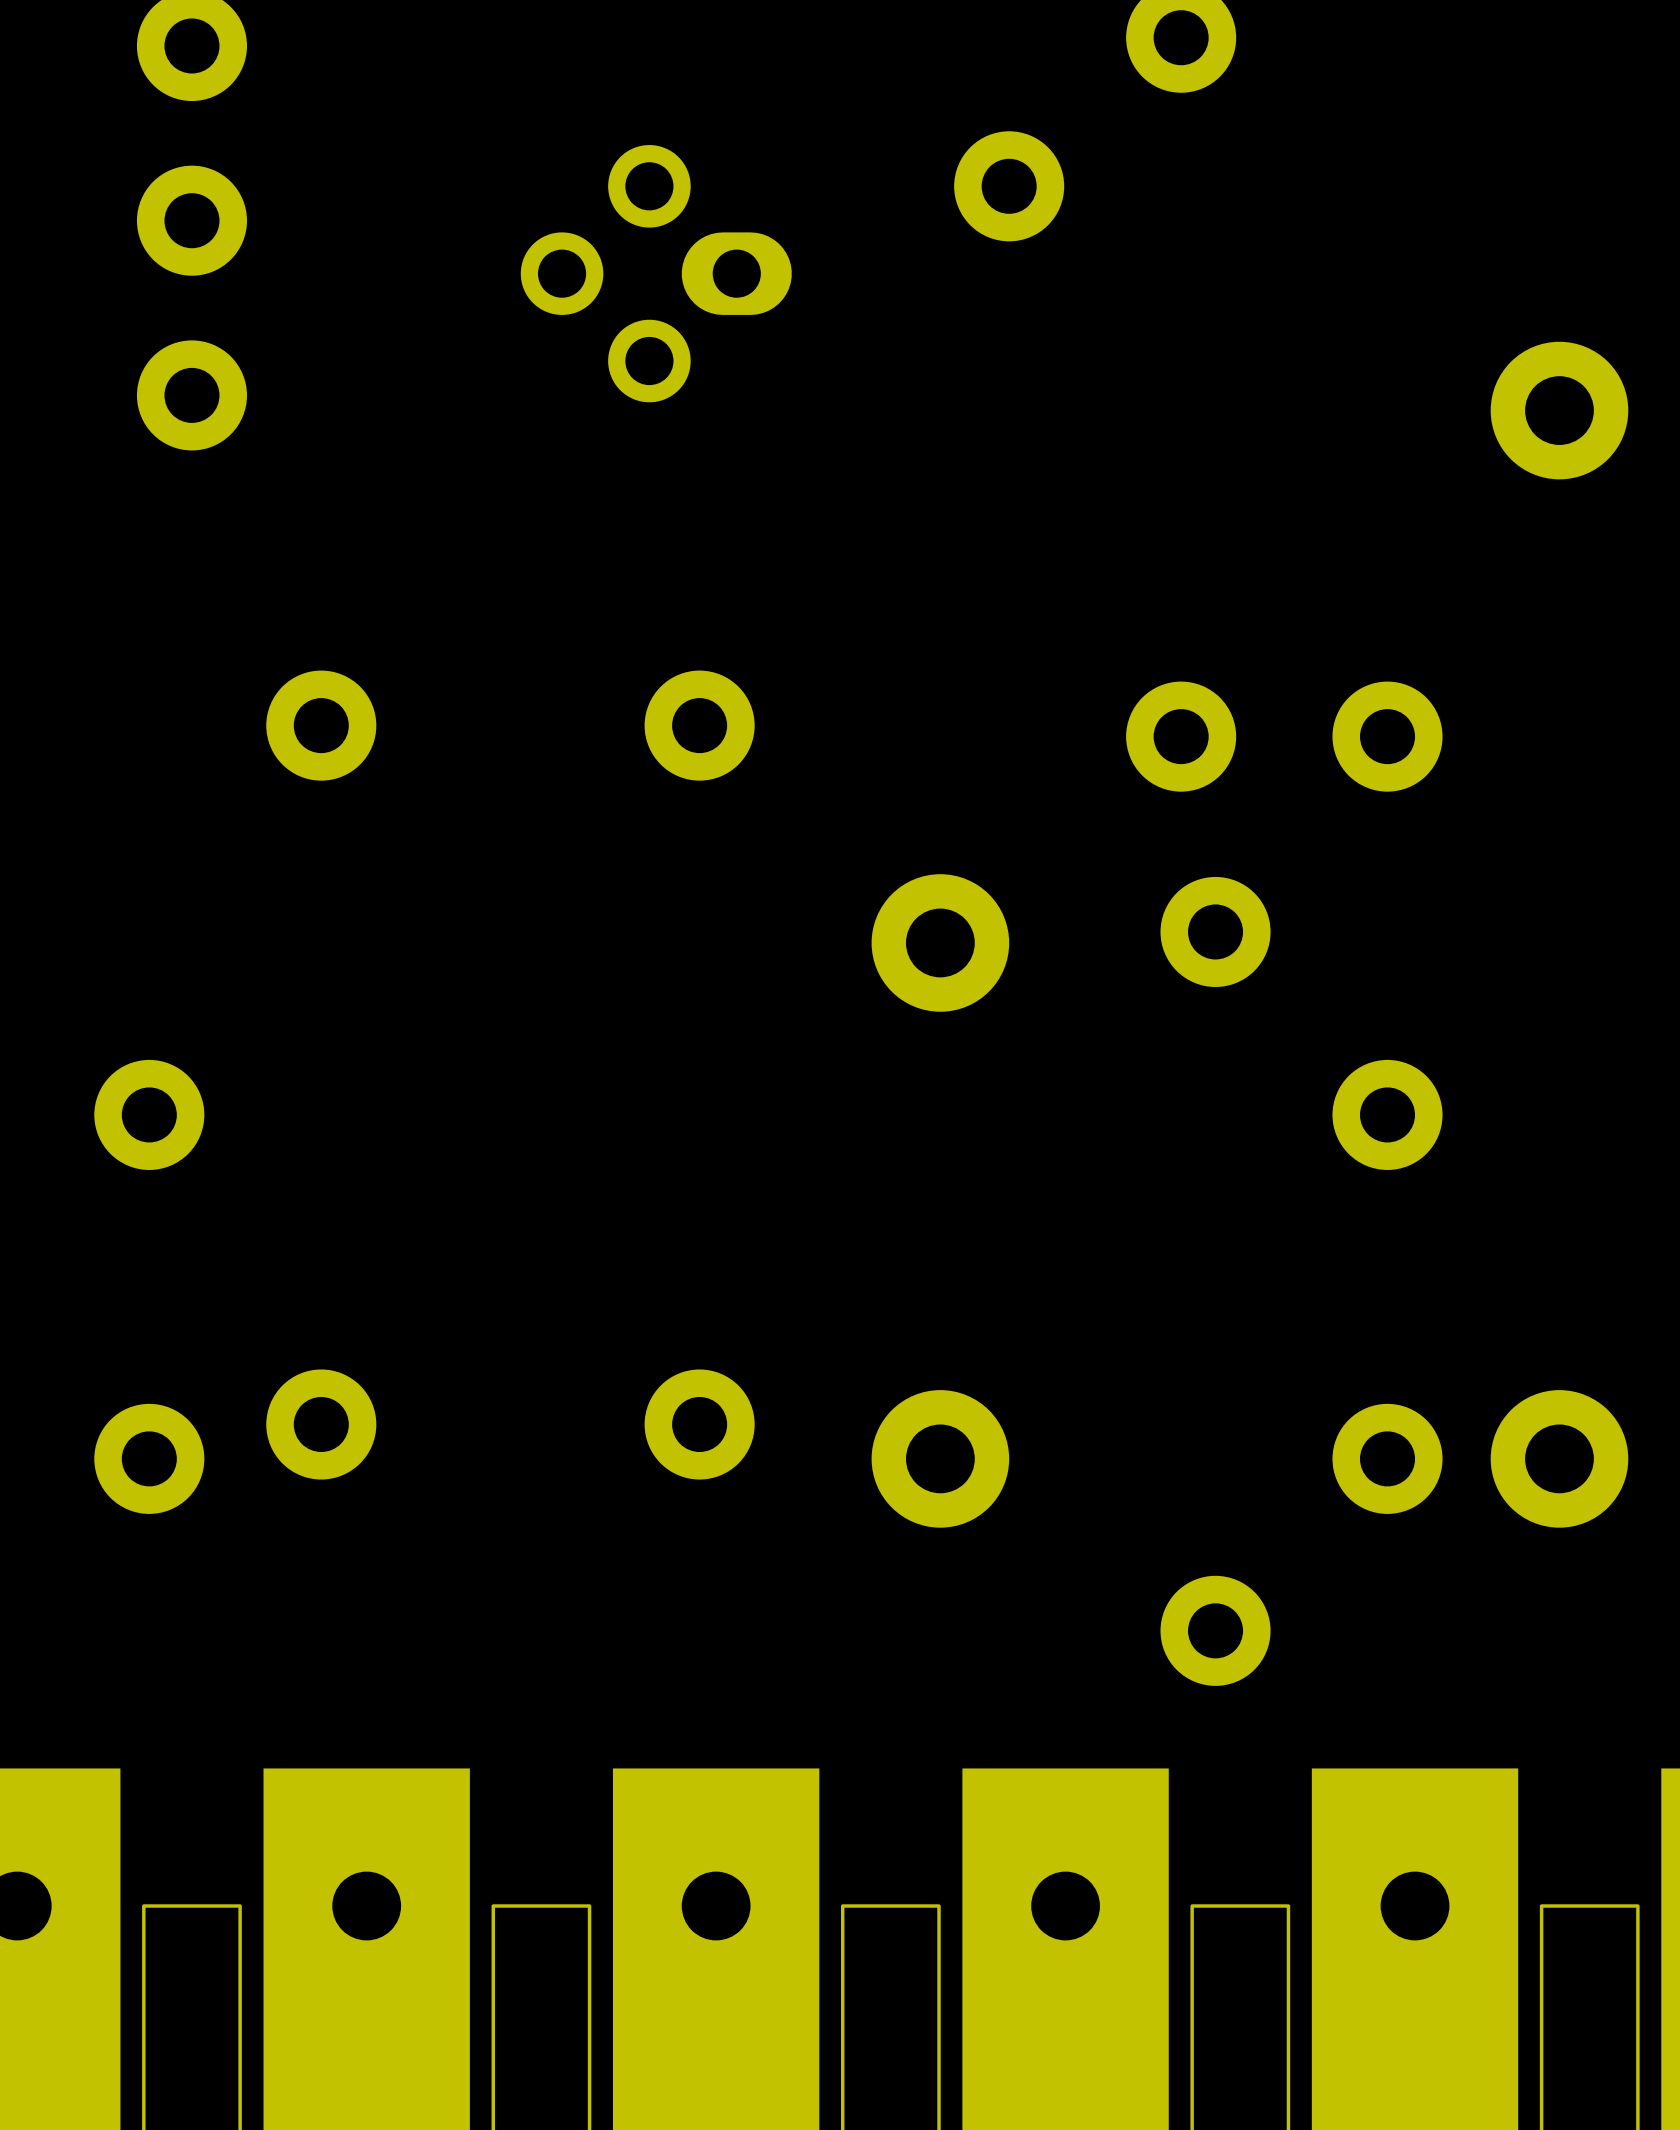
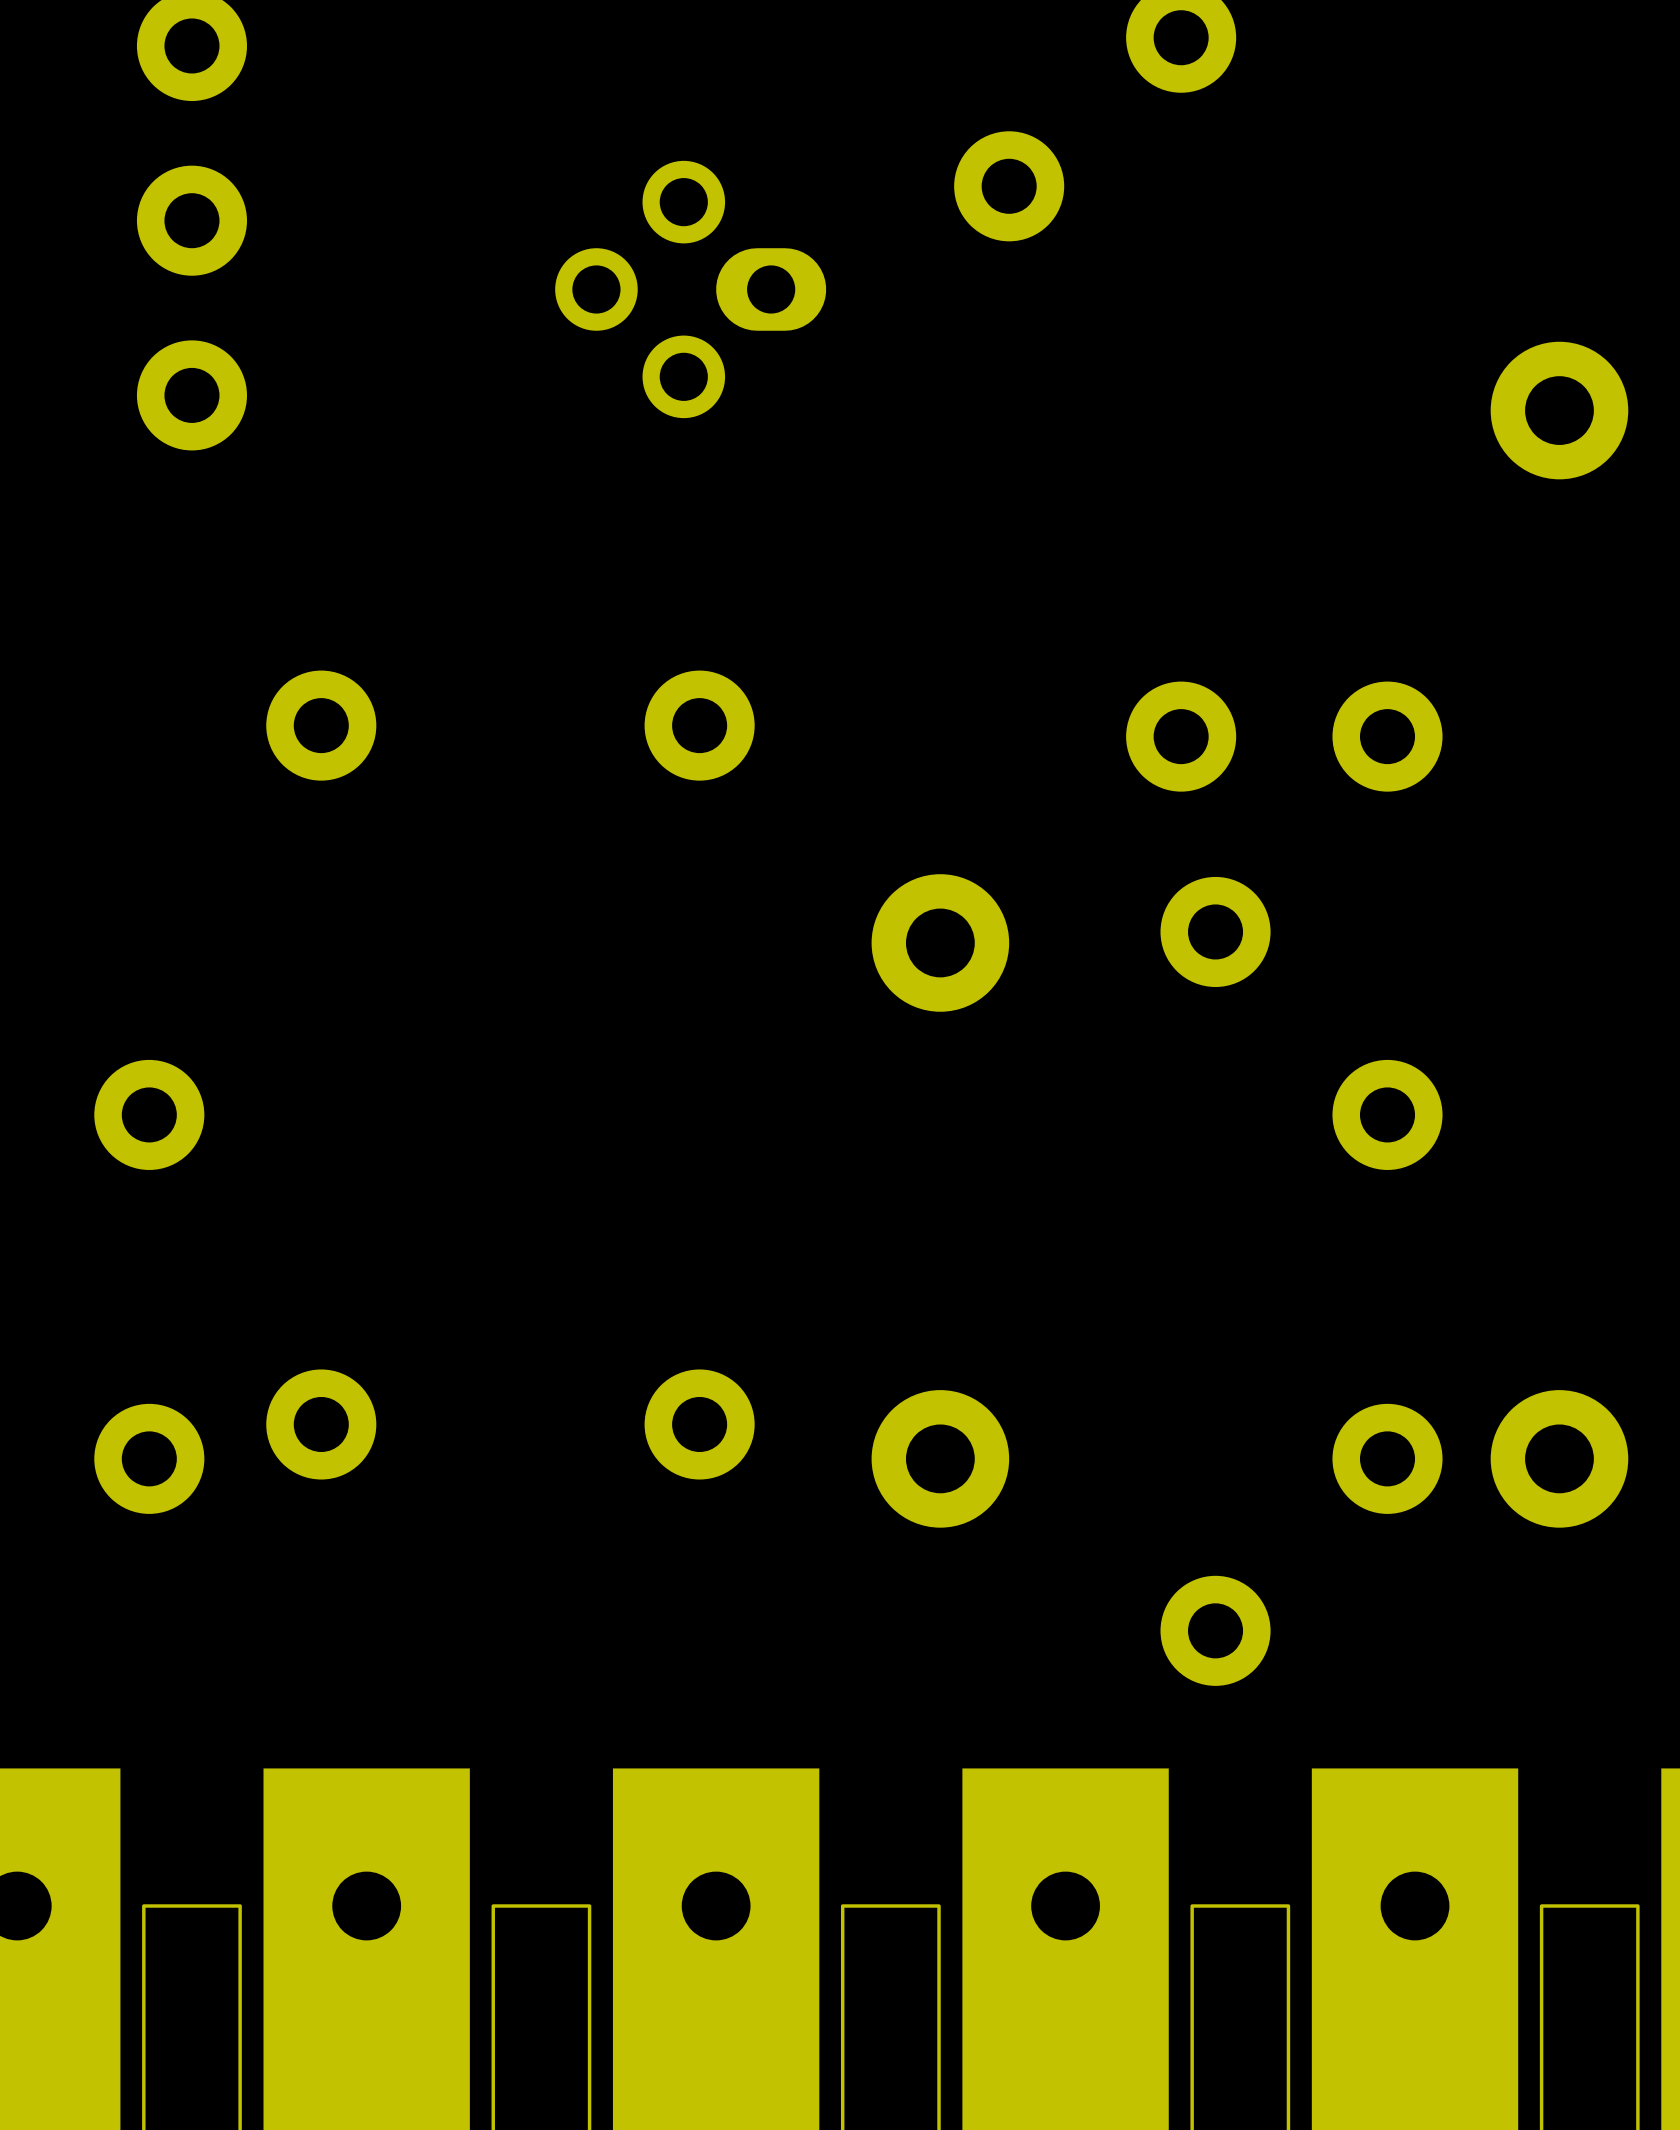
part position: (656, 273) -> (690, 289)

